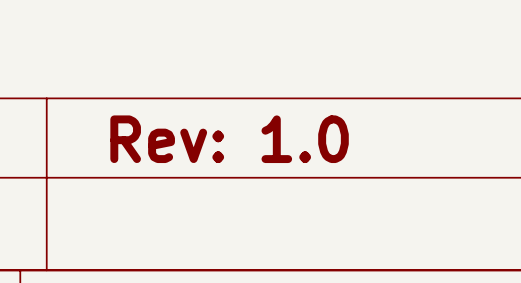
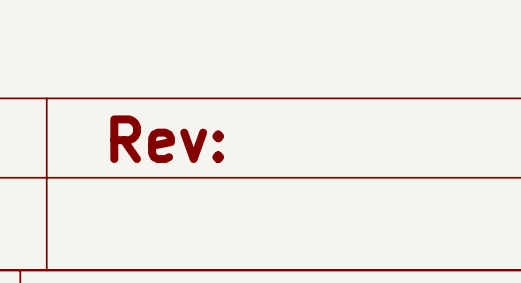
title block: Rev: 1.0 (229, 139) -> Rev: (167, 139)

